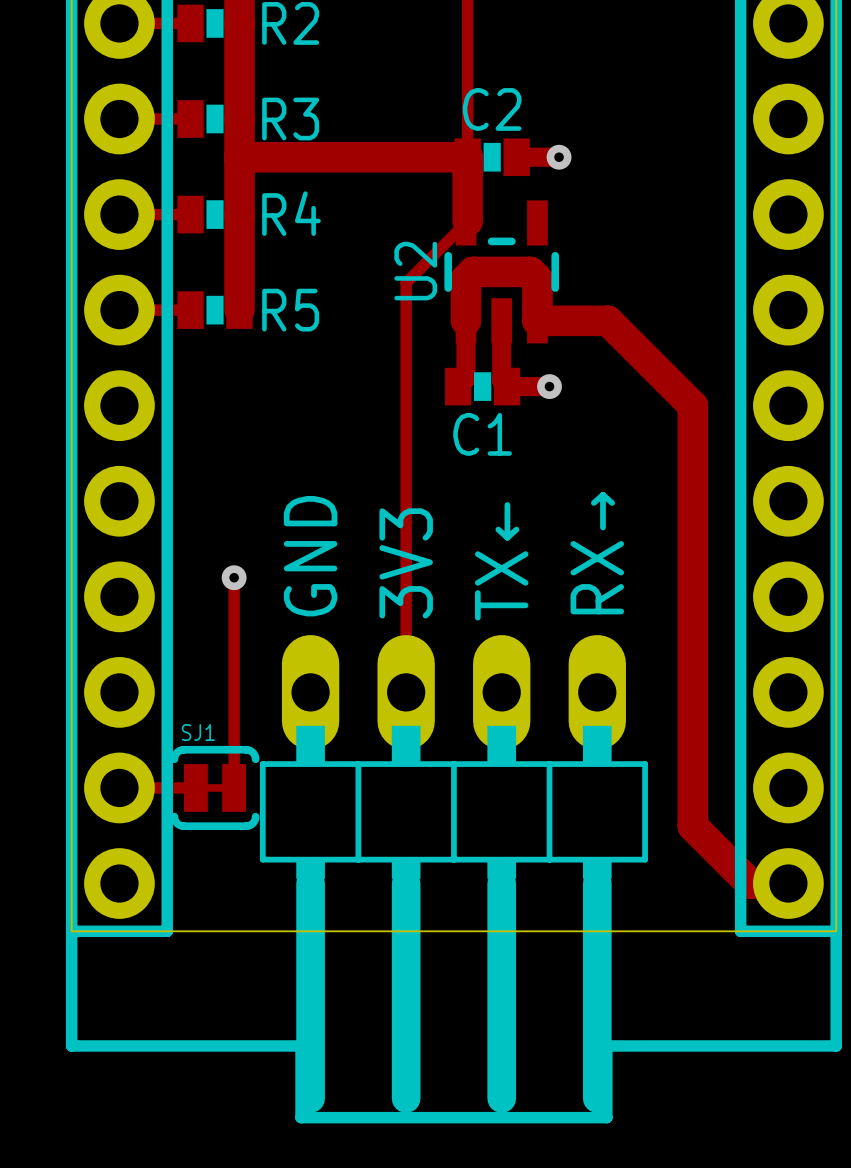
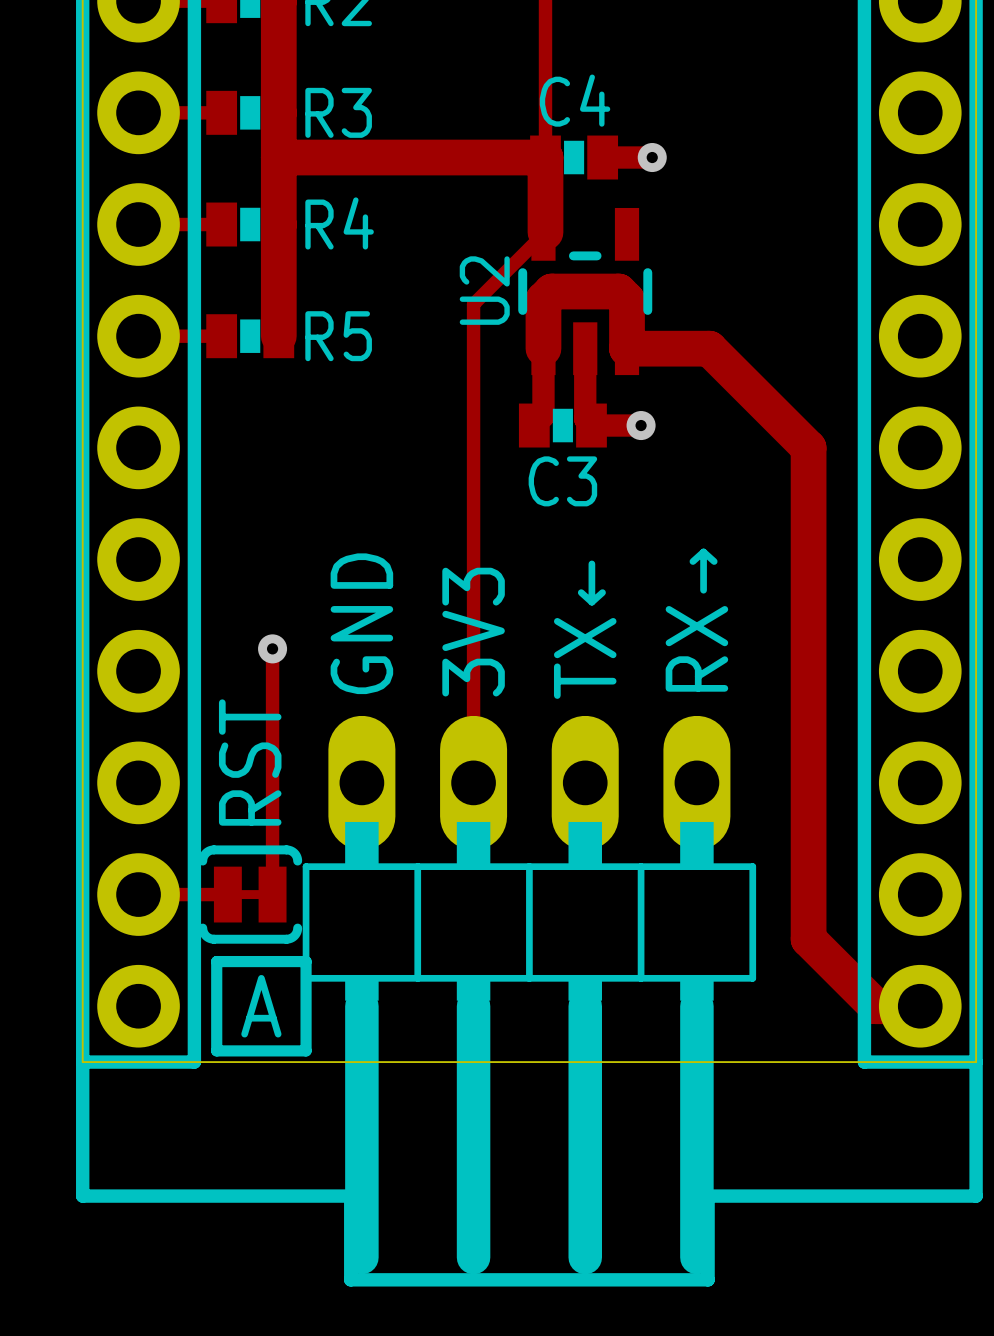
C2 name: C2 (492, 109) -> C4 (575, 100)
C1 name: C1 (482, 434) -> C3 (562, 481)
text: none -> RST (250, 762)
SJ1 name: SJ1 (198, 732) -> none
line: none -> (216, 961) (306, 961) (306, 1050) (216, 1050) (216, 961)
text: none -> A (261, 1006)

